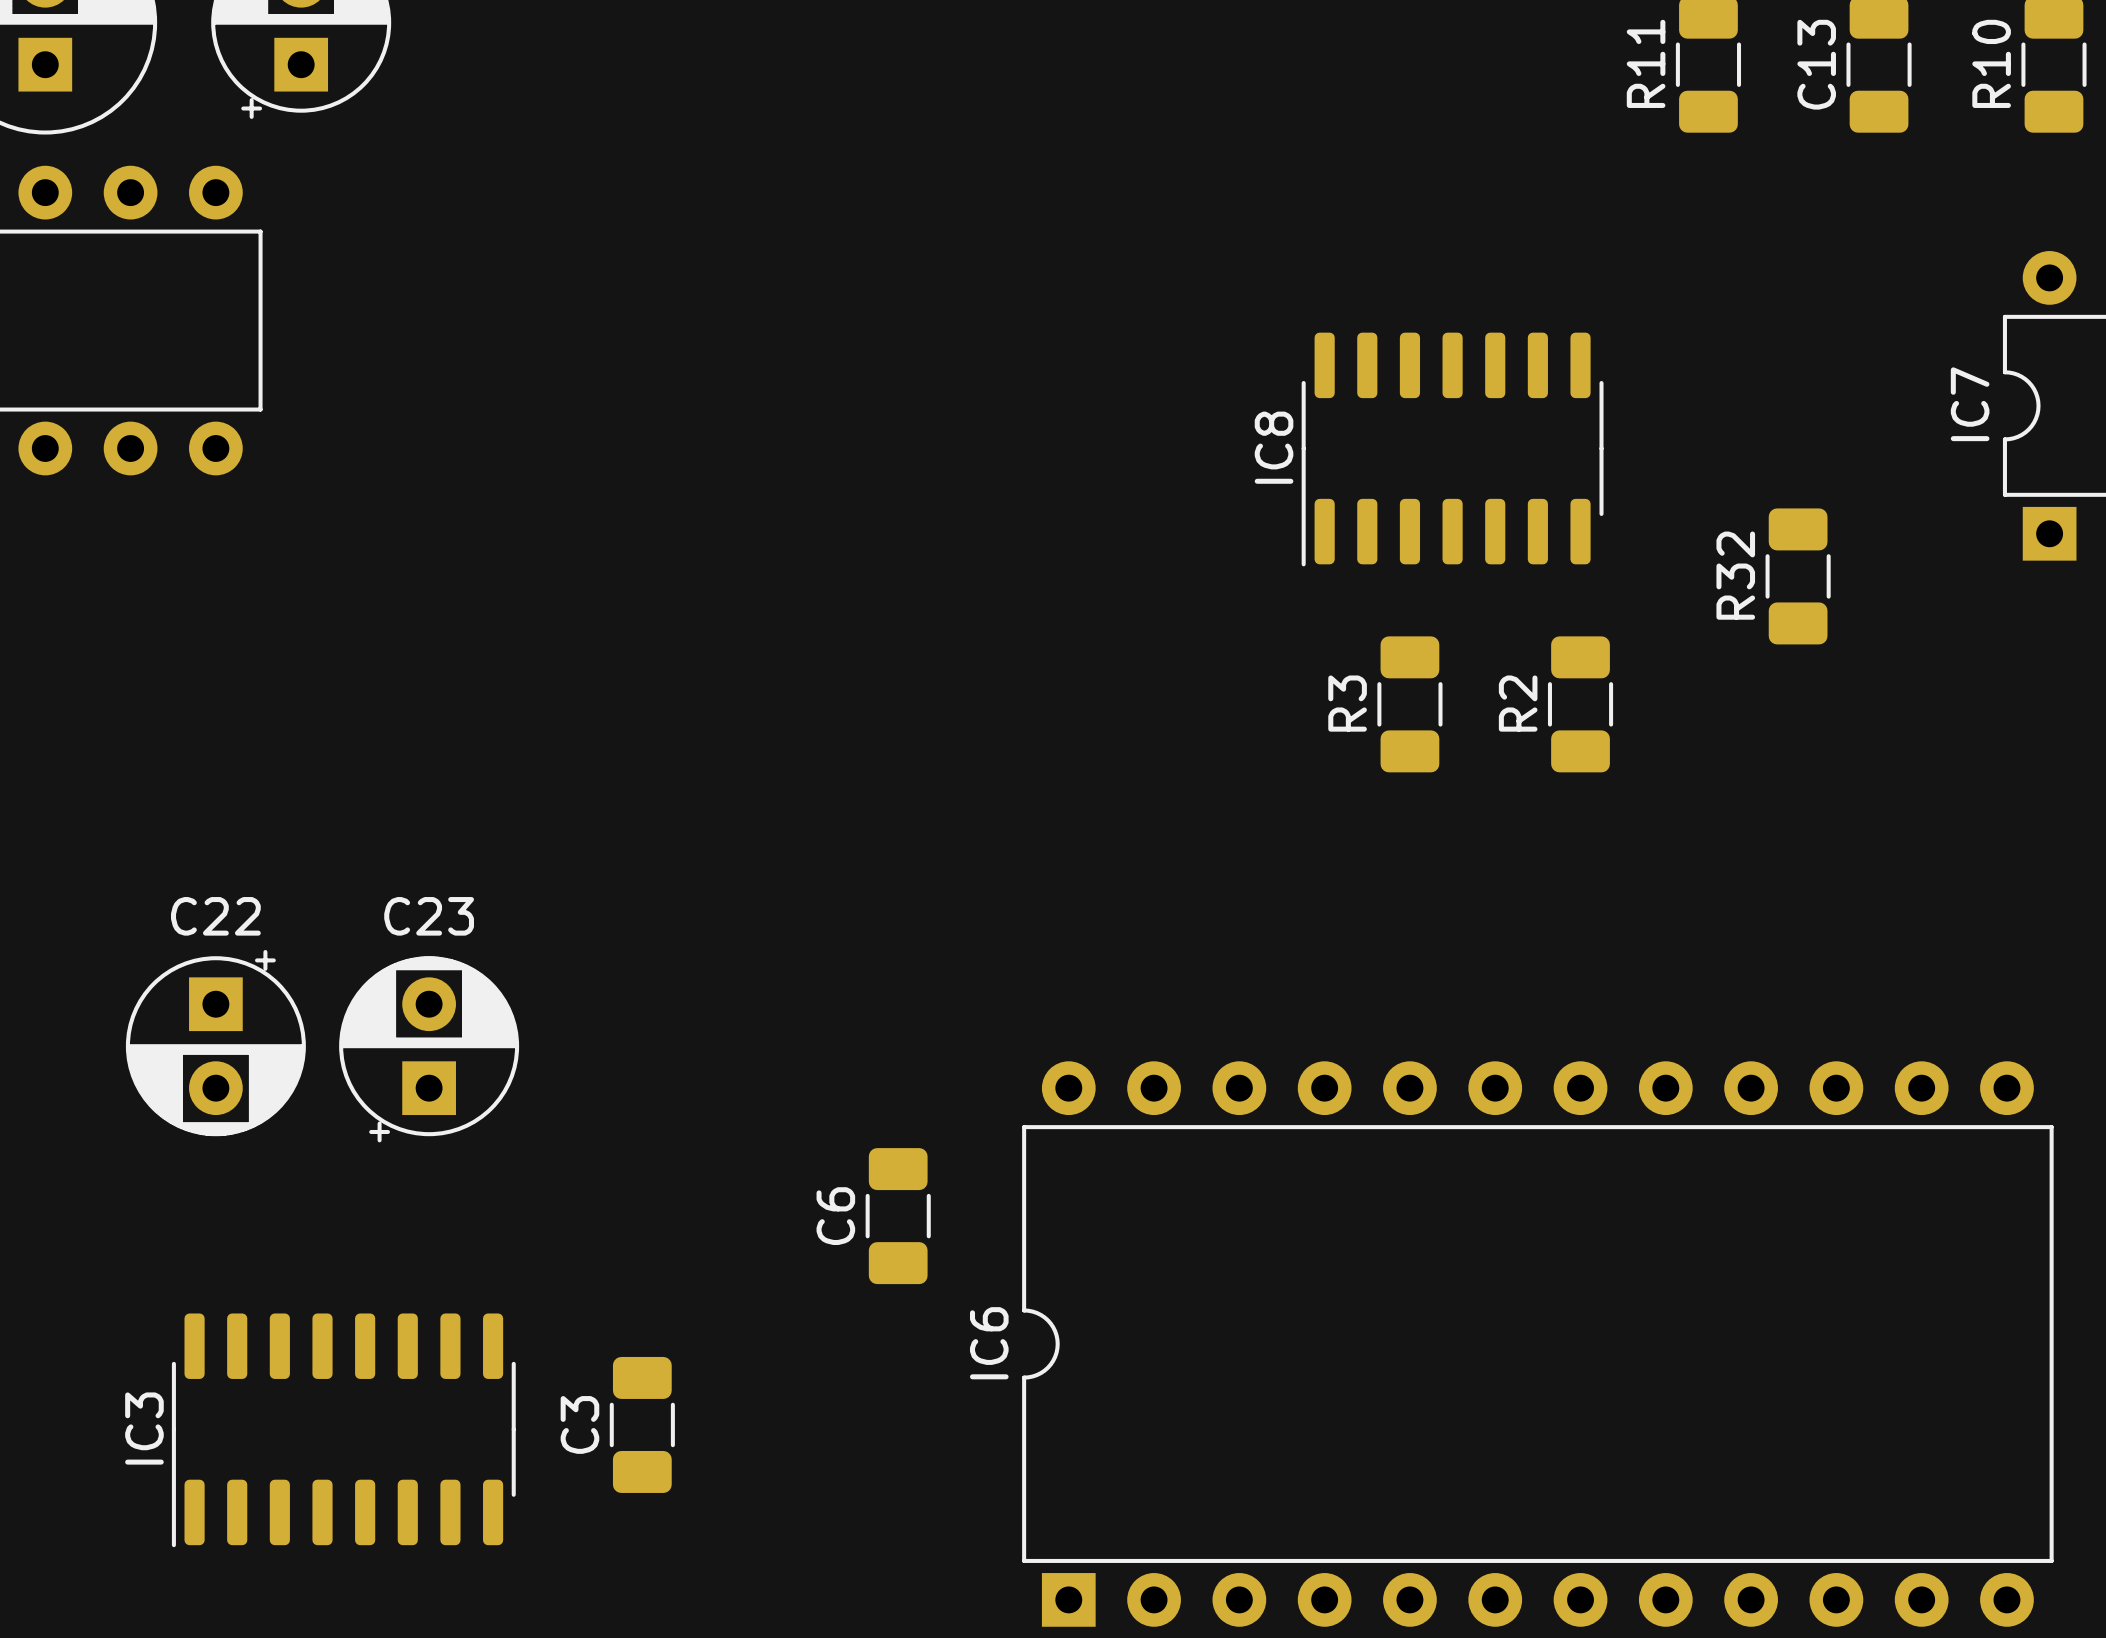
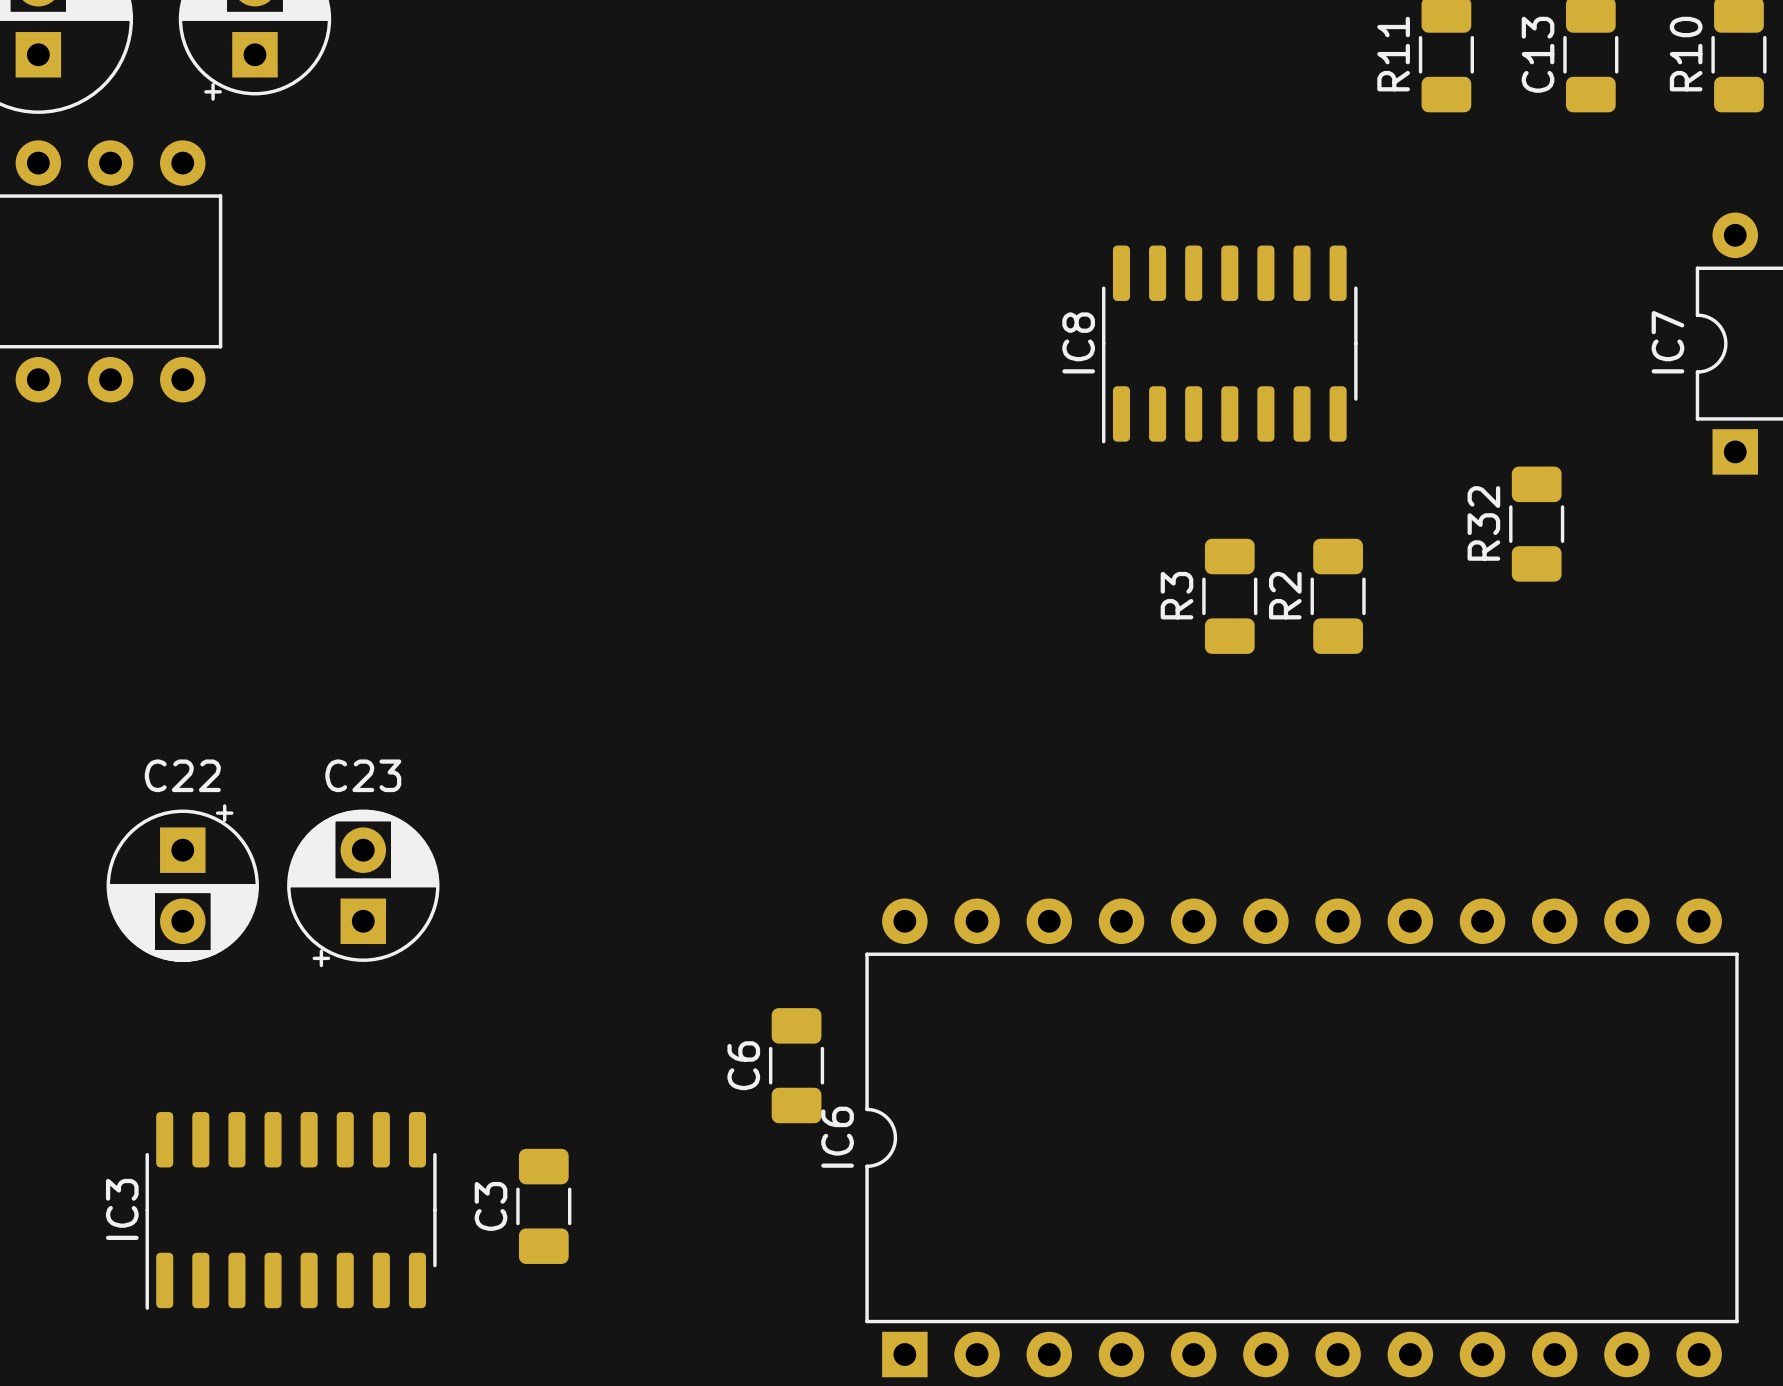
IC8 position: (1452, 449) -> (1229, 344)
R32 position: (1798, 576) -> (1536, 524)
R3 position: (1409, 704) -> (1229, 596)
C6 position: (898, 1216) -> (796, 1065)

